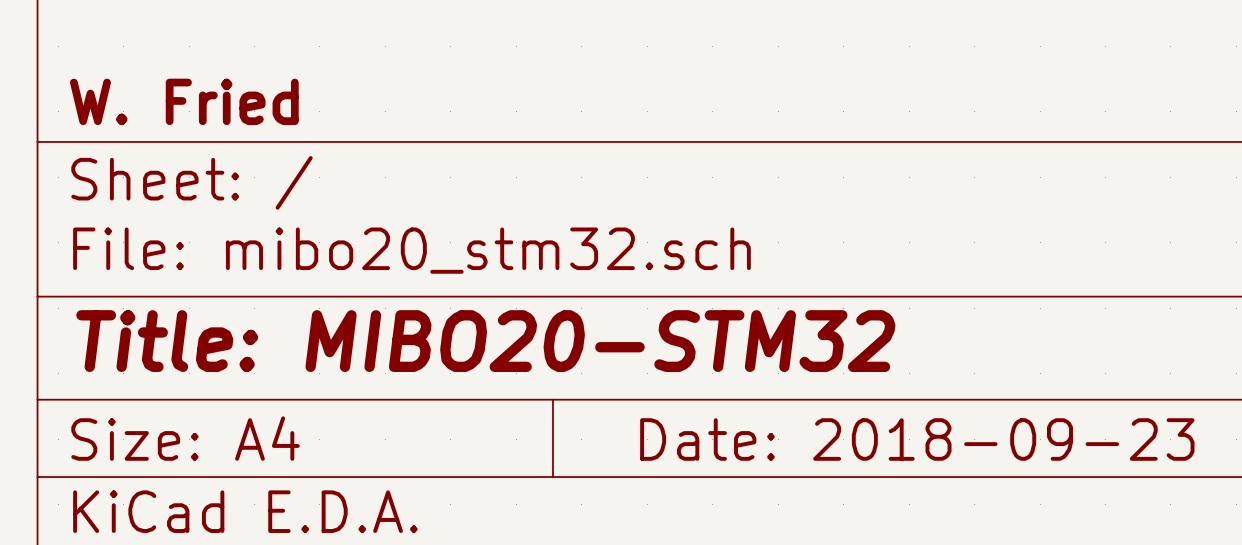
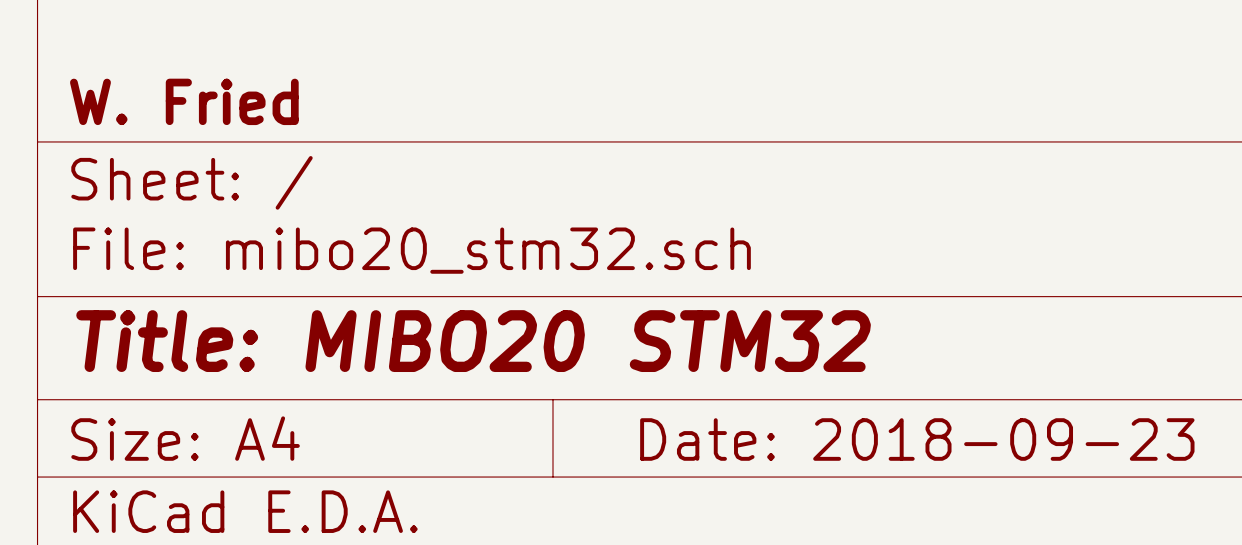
title block: Title: MIBO20-STM32 (485, 341) -> Title: MIBO20 STM32 (473, 341)

